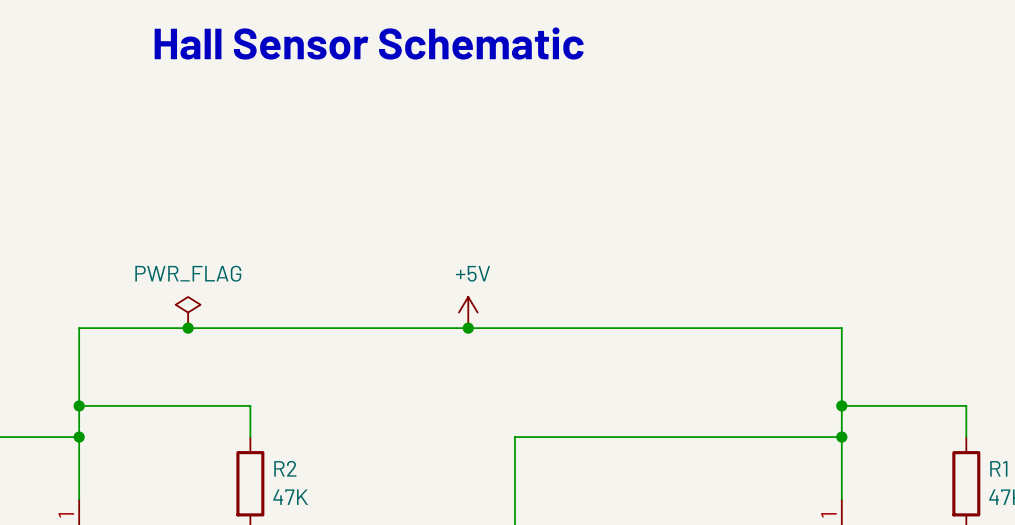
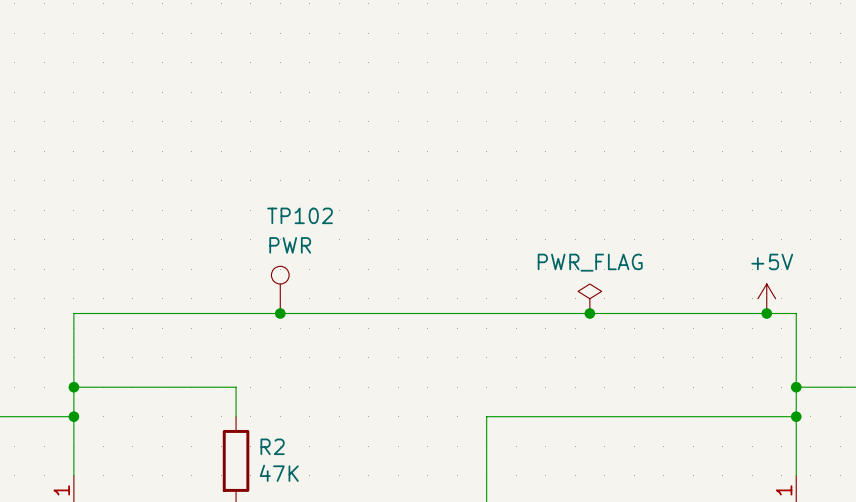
text: Hall Sensor Schematic (369, 43) -> none
TP102: none -> PWR (280, 289)
power symbol: PWR_FLAG (188, 312) -> none
power symbol: +5V (468, 312) -> none
power symbol: none -> PWR_FLAG (589, 298)
power symbol: none -> +5V (766, 298)
junction: (188, 328) -> none
junction: none -> (280, 313)
junction: (468, 328) -> none
junction: none -> (589, 313)
junction: none -> (766, 313)

